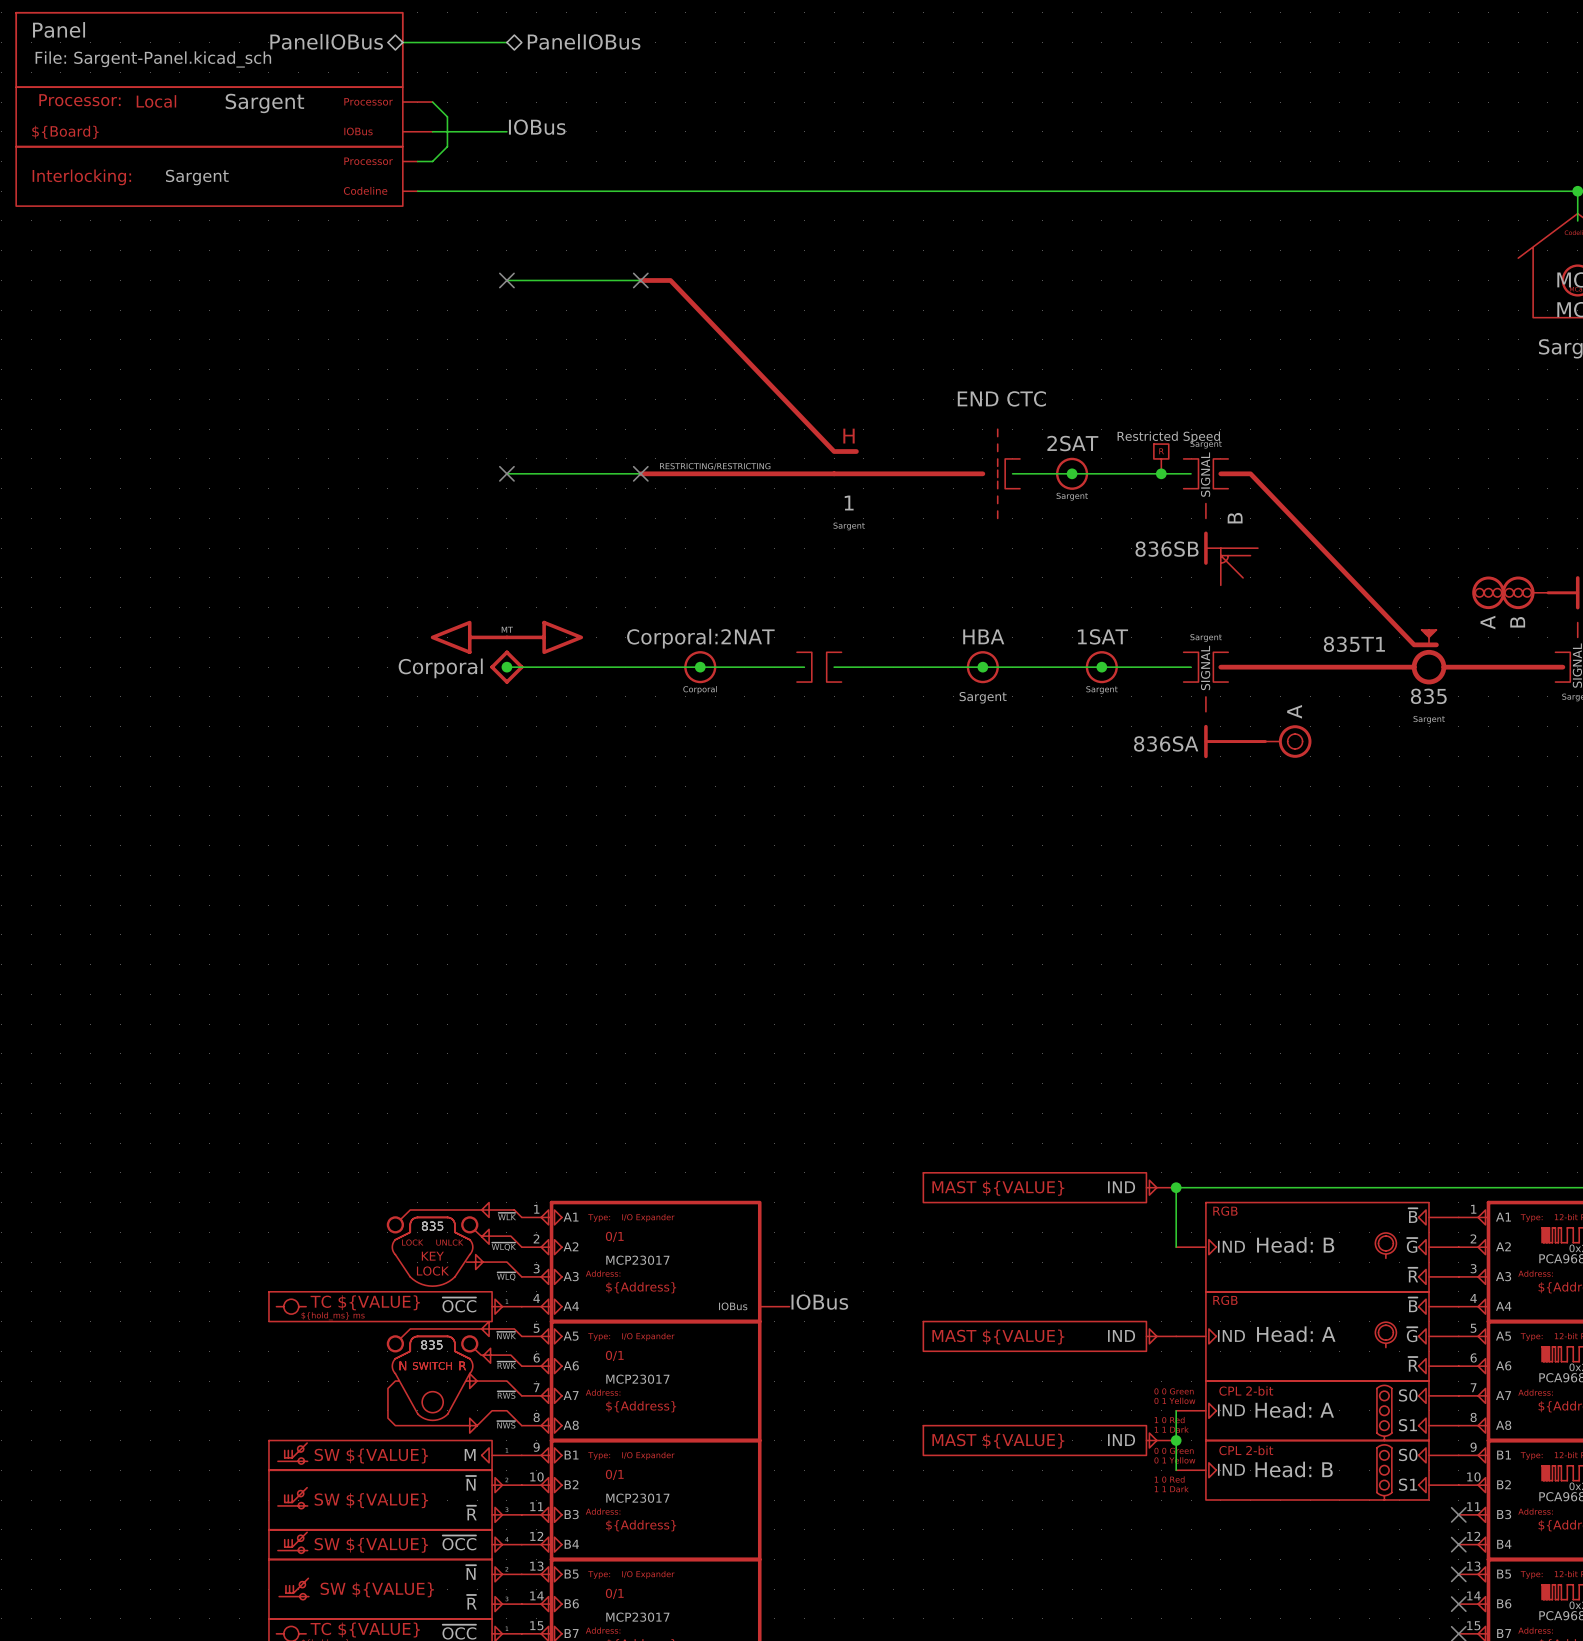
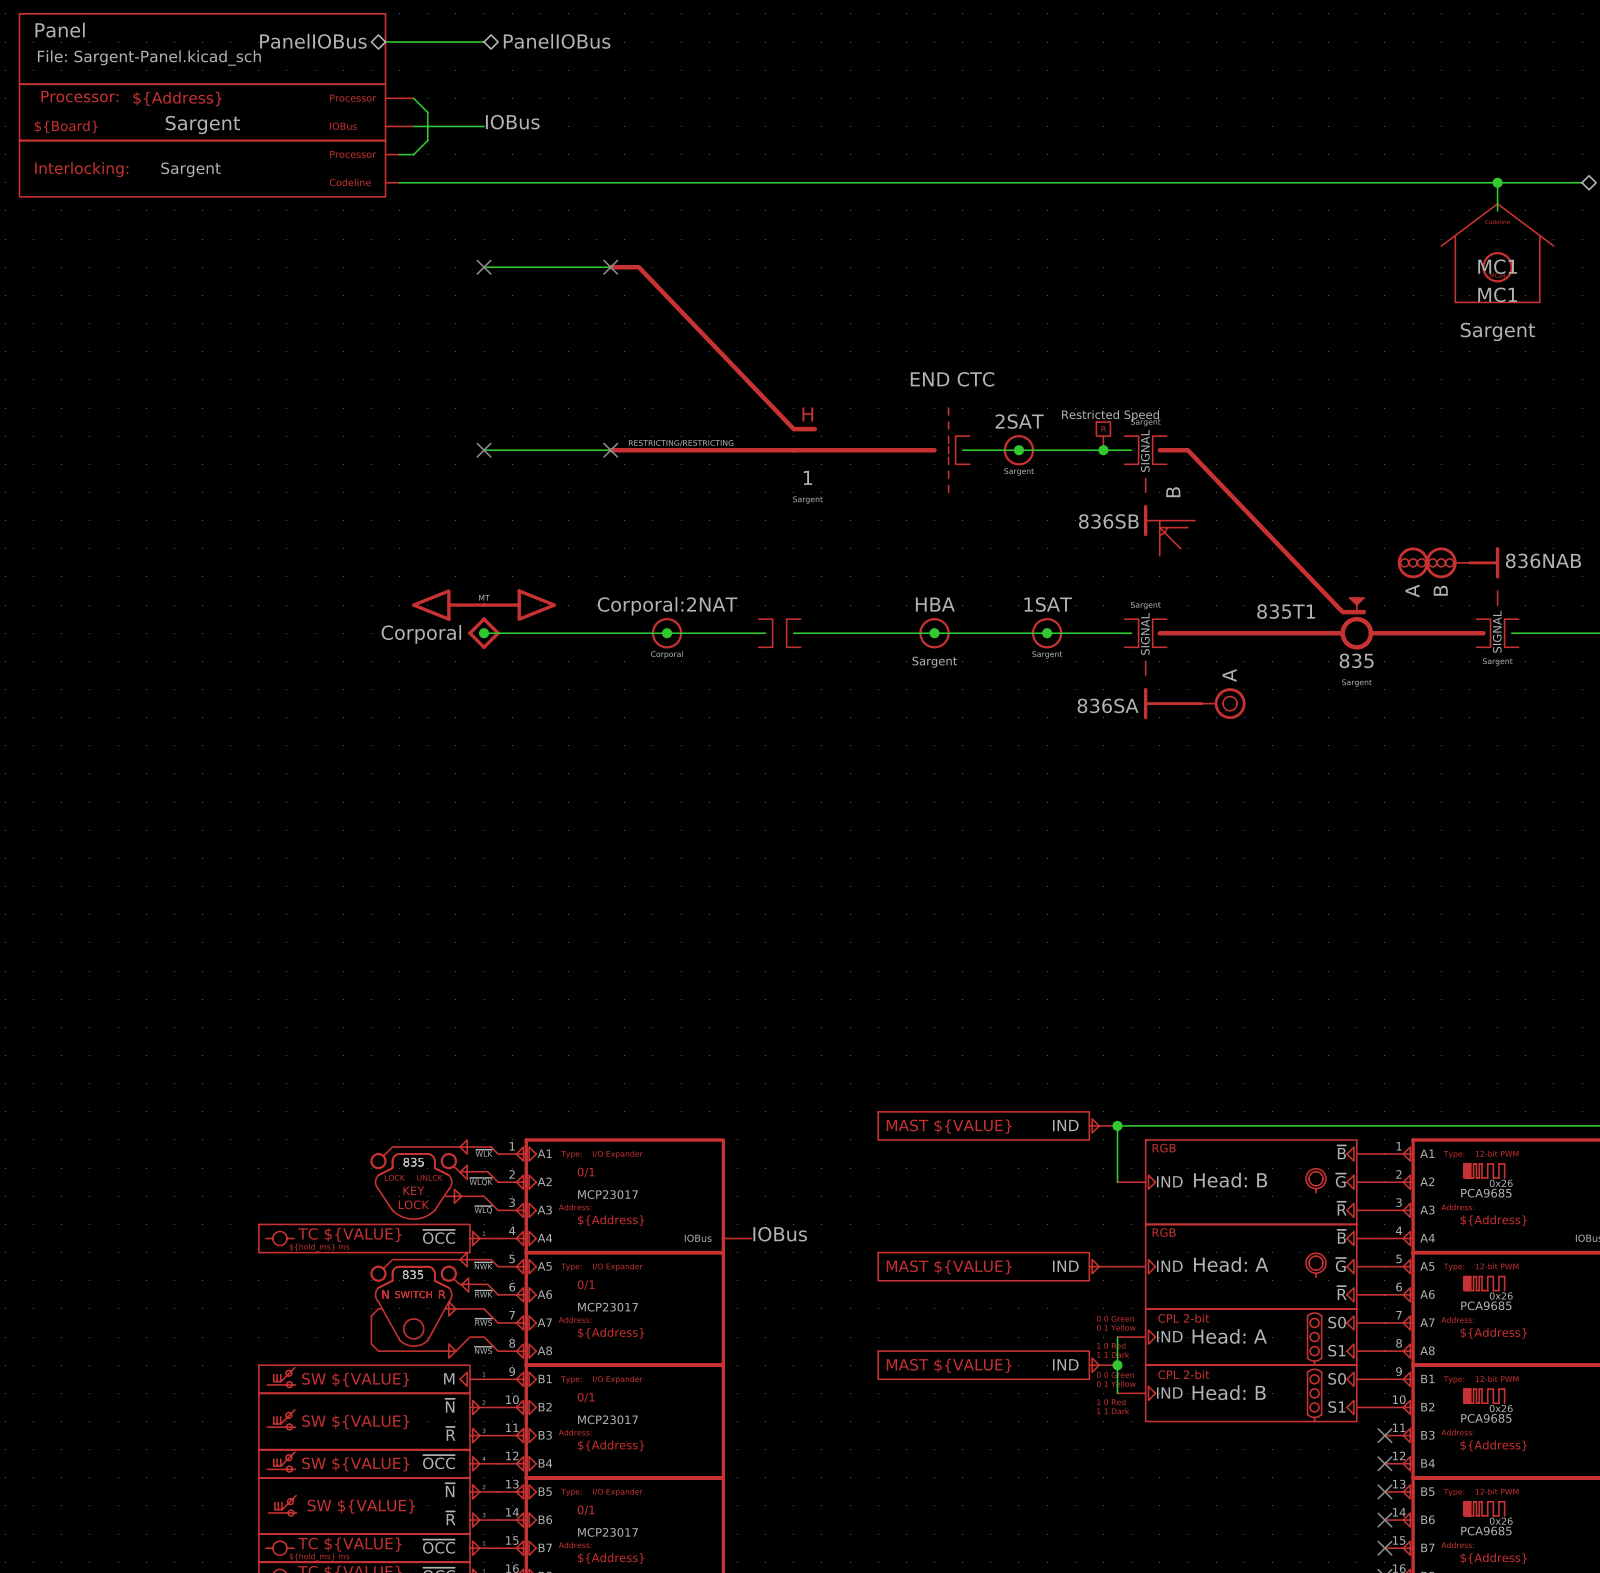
part text: Local (156, 101) -> ${Address} (177, 98)
part value position: Sargent (264, 103) -> Sargent (202, 125)

